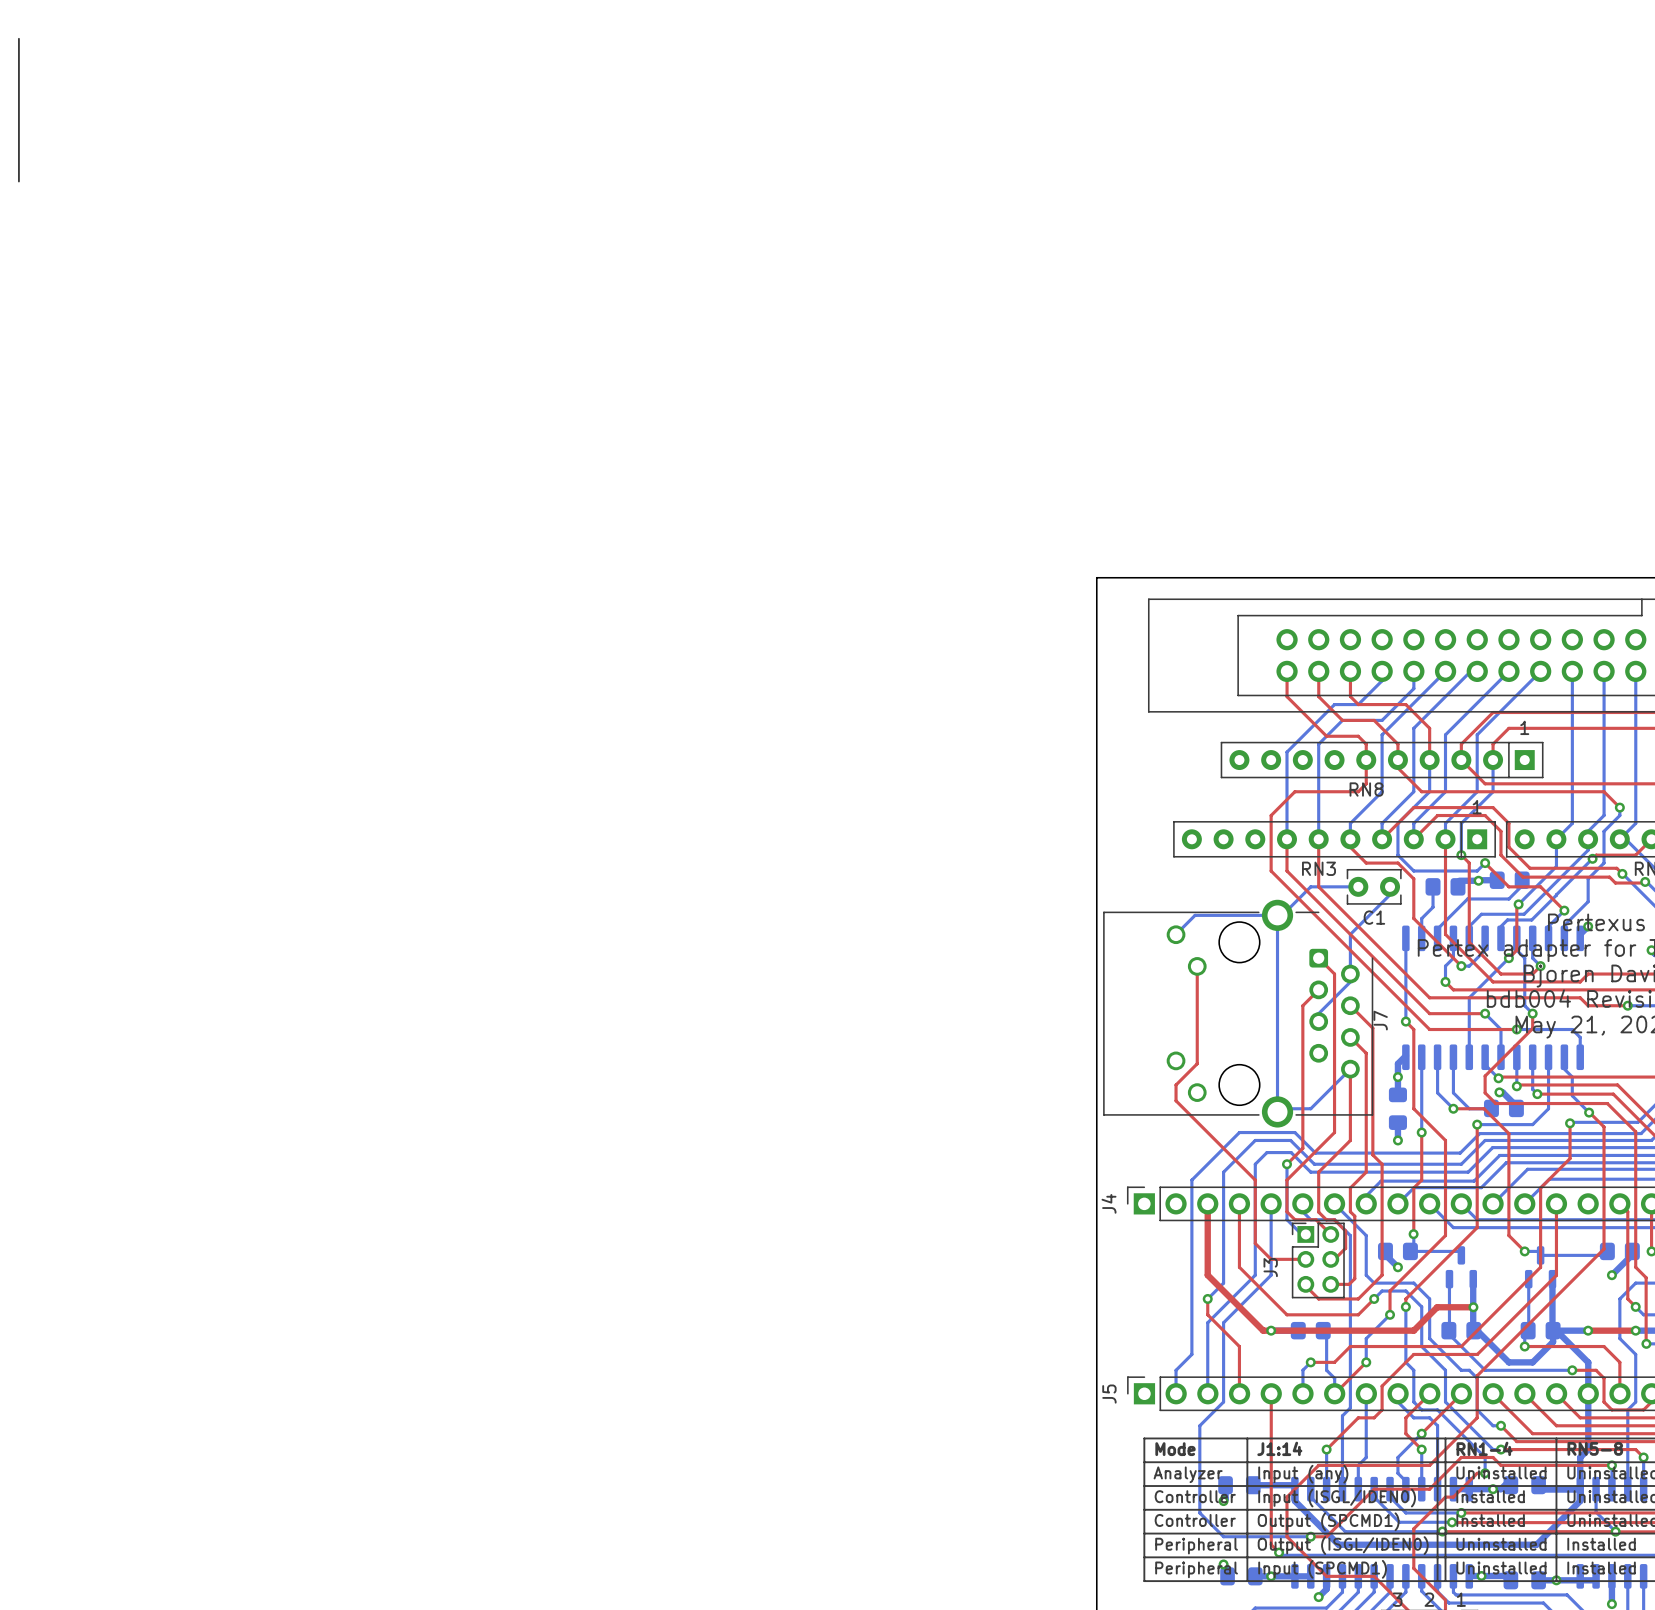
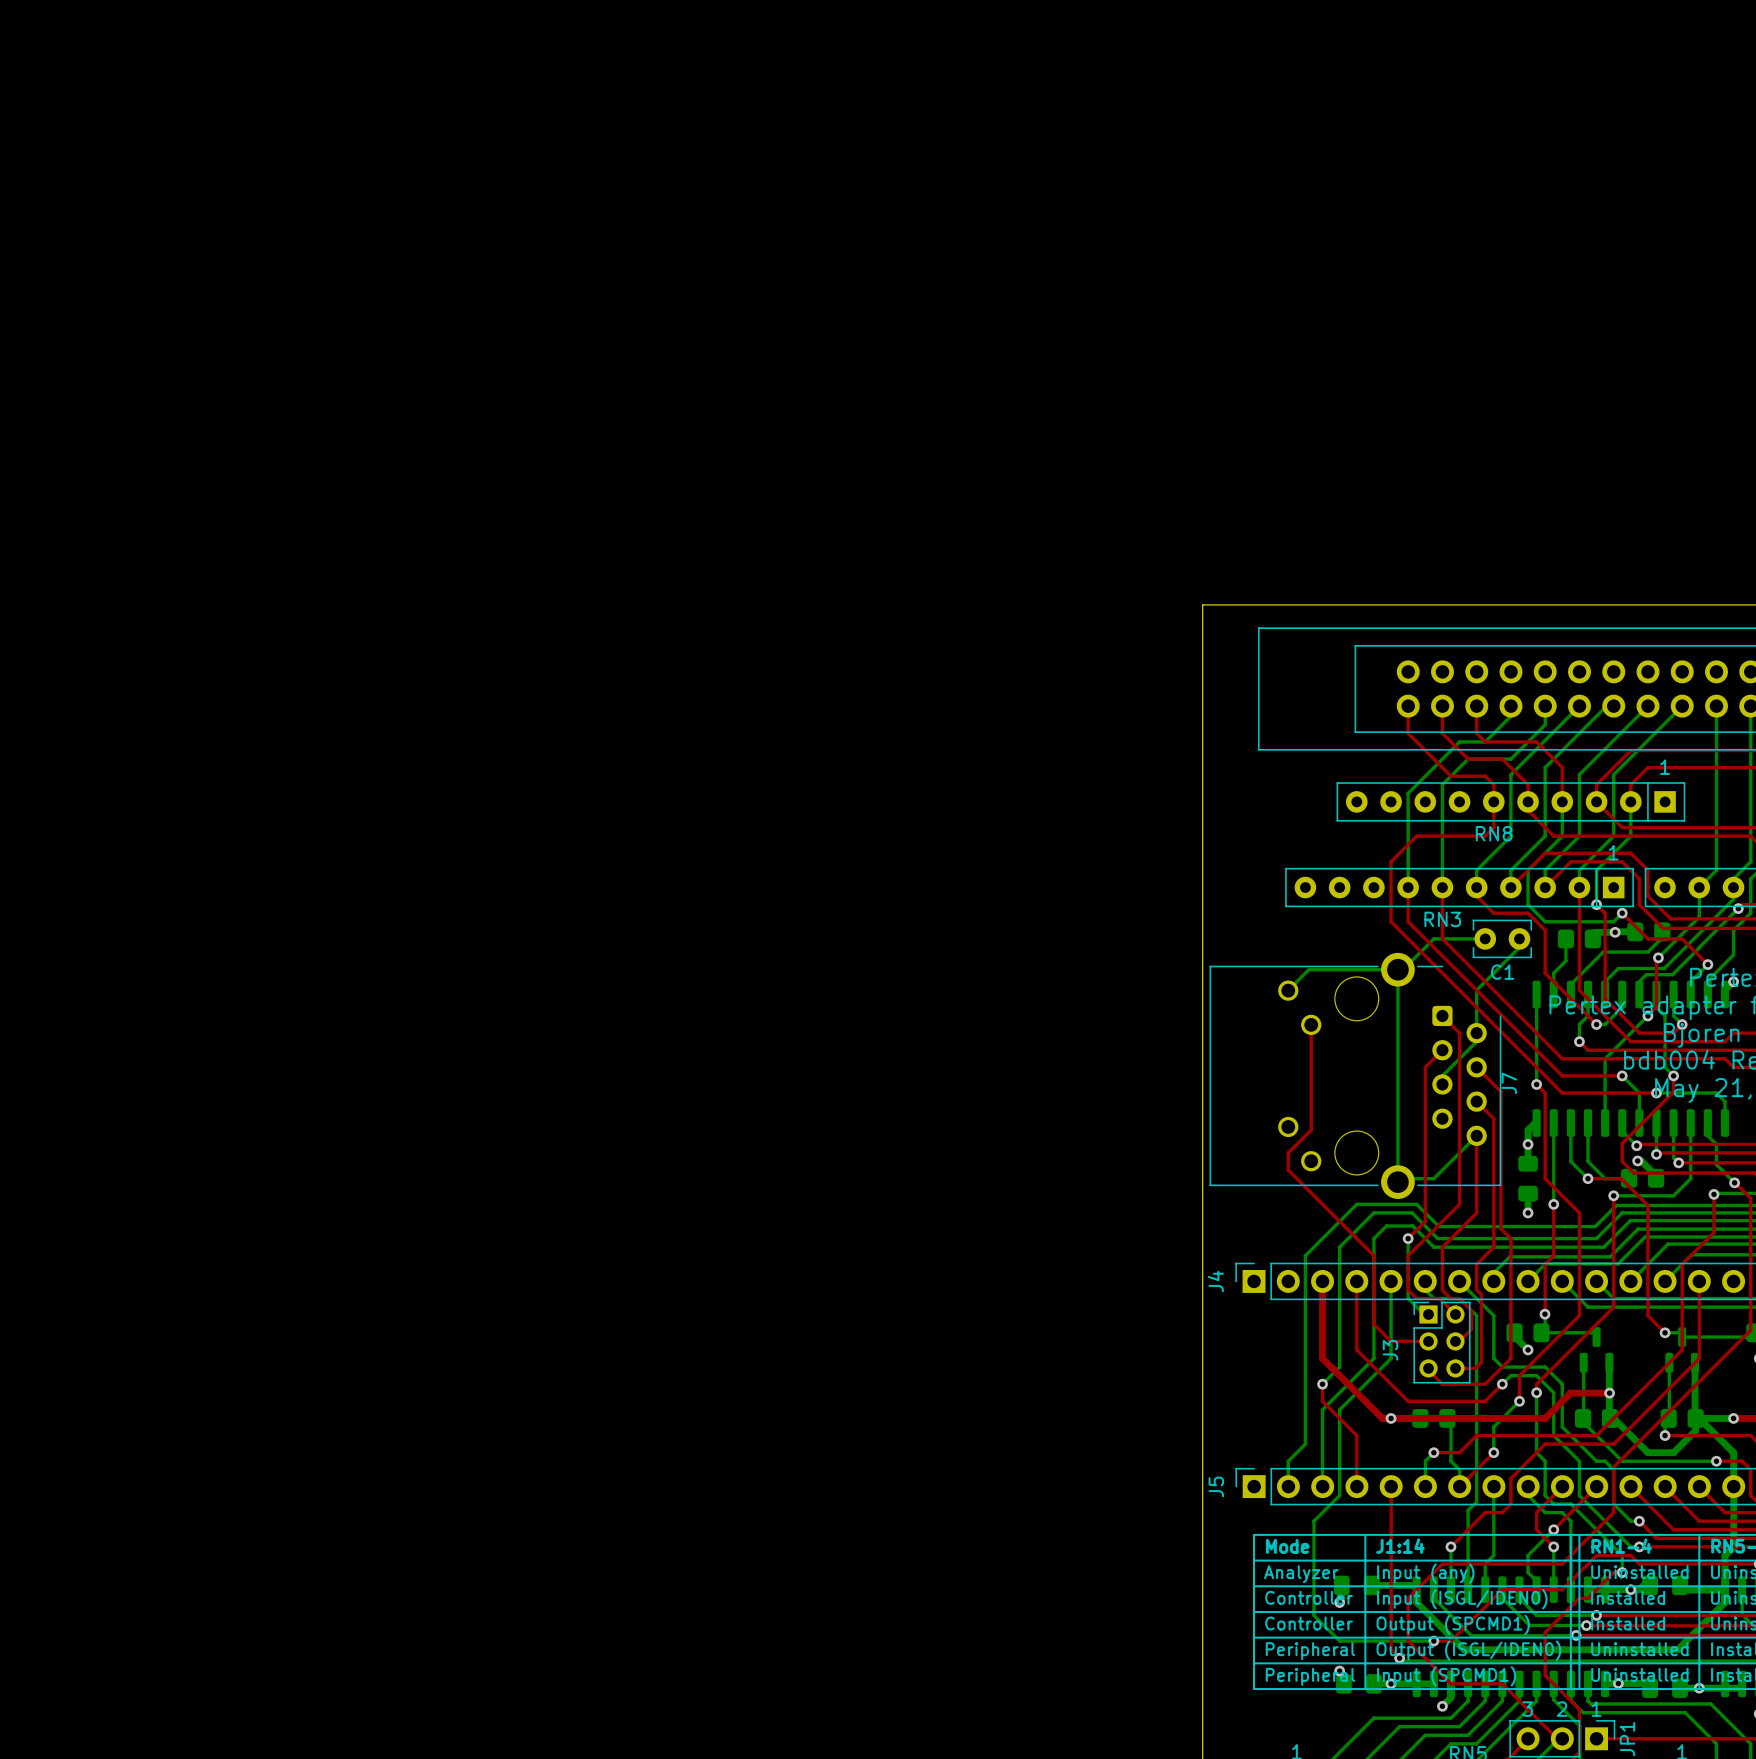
line: (18, 38) (18, 181) -> none

